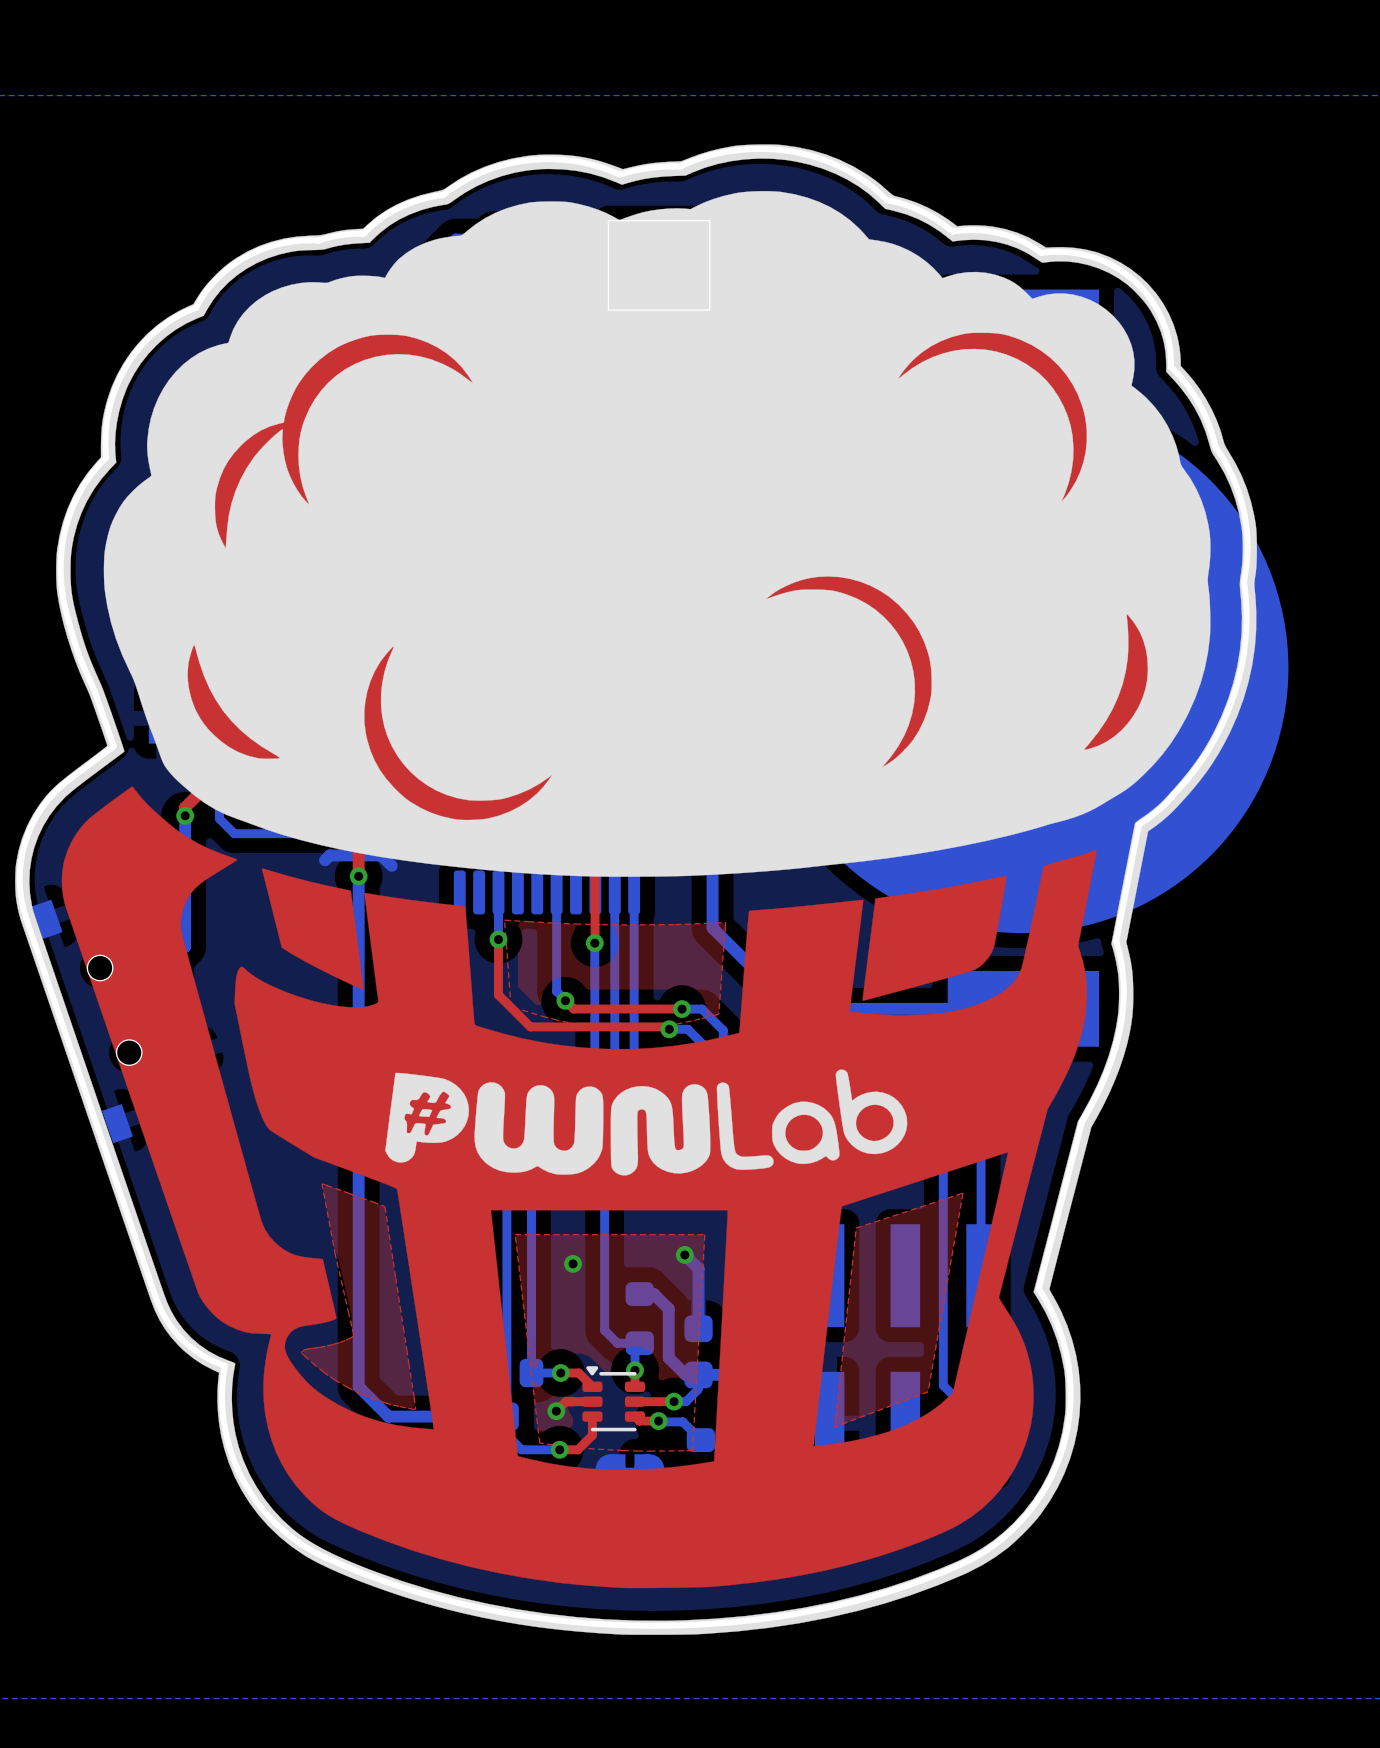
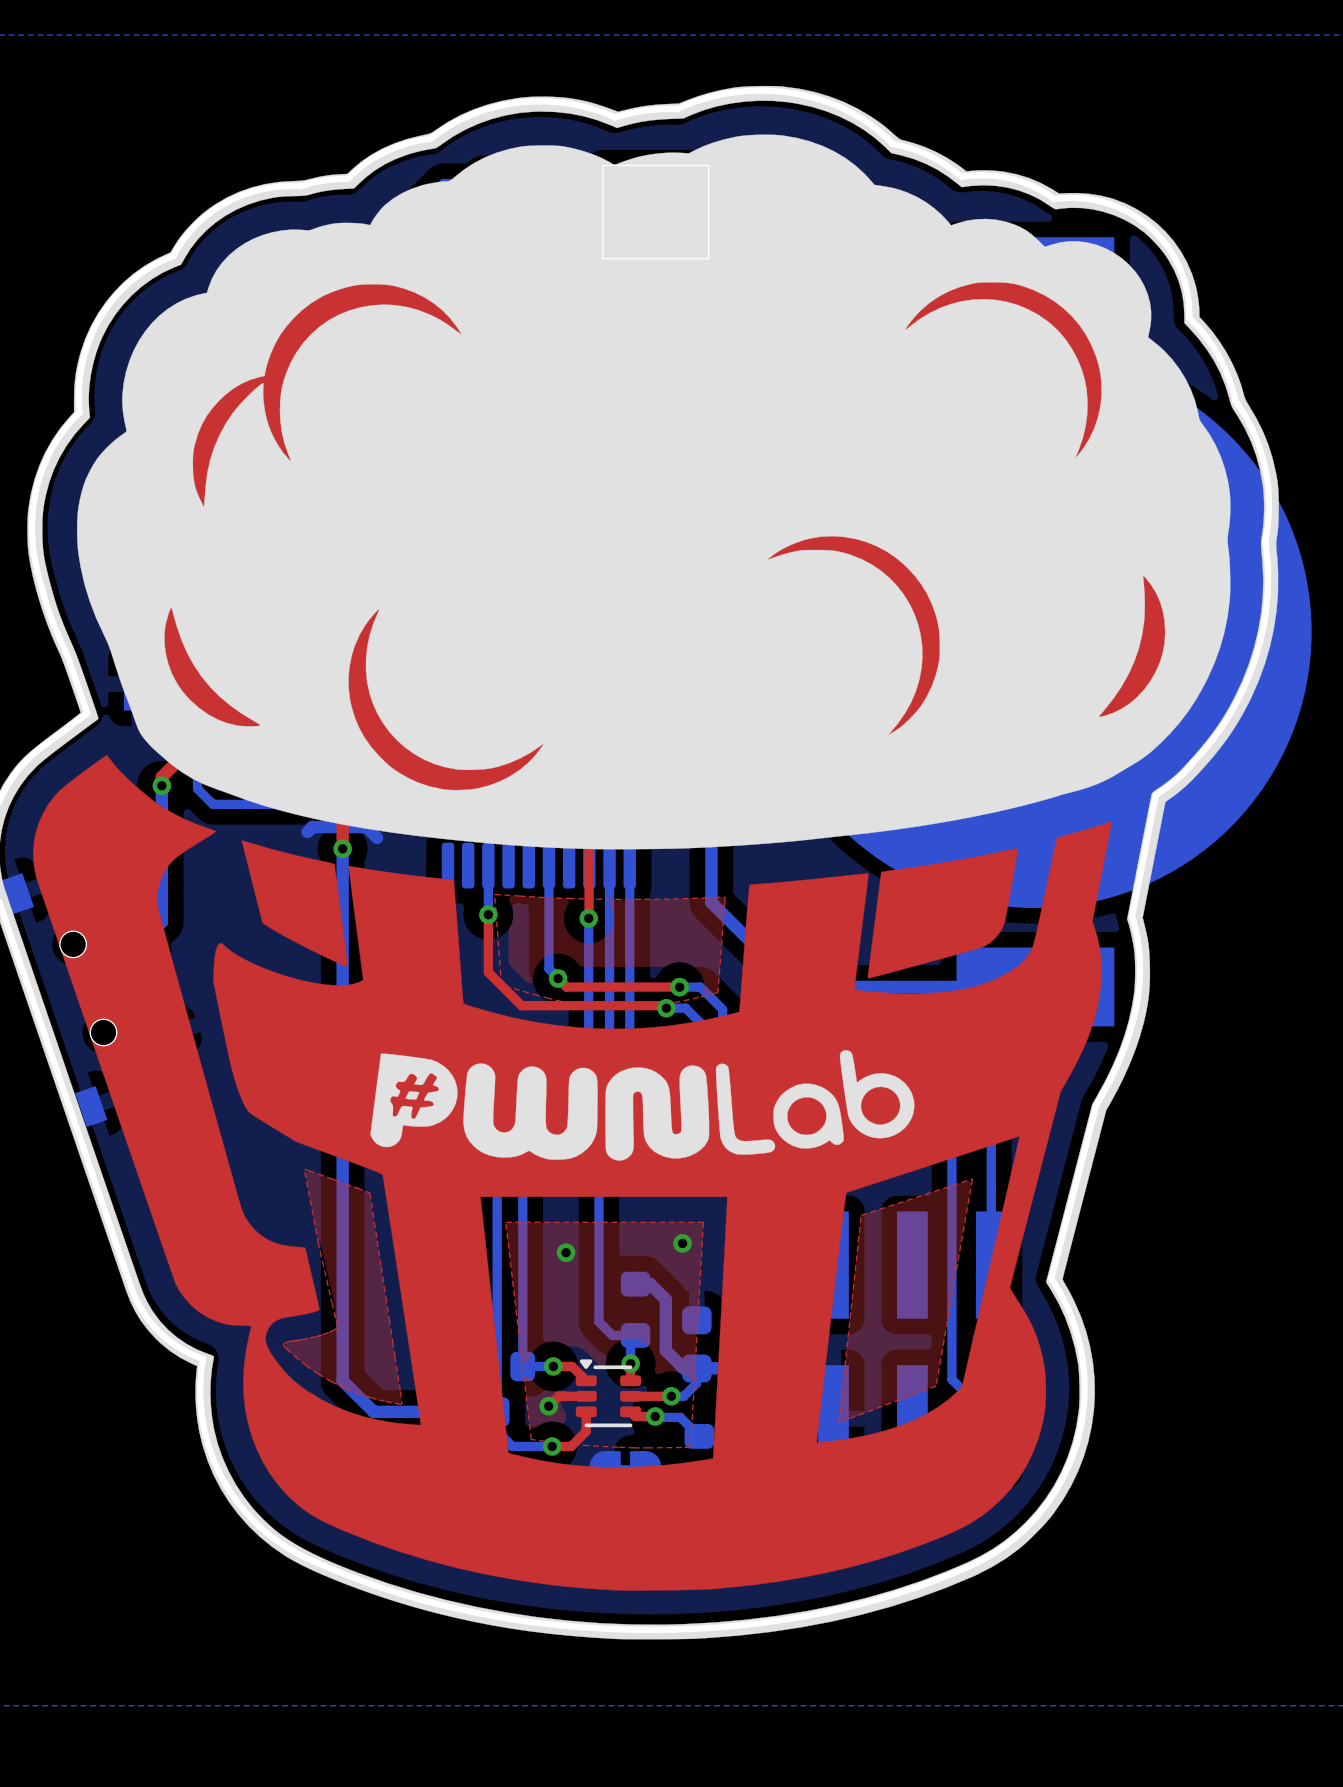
bottom track: (684, 1254) (698, 1268) (698, 1328) -> none

